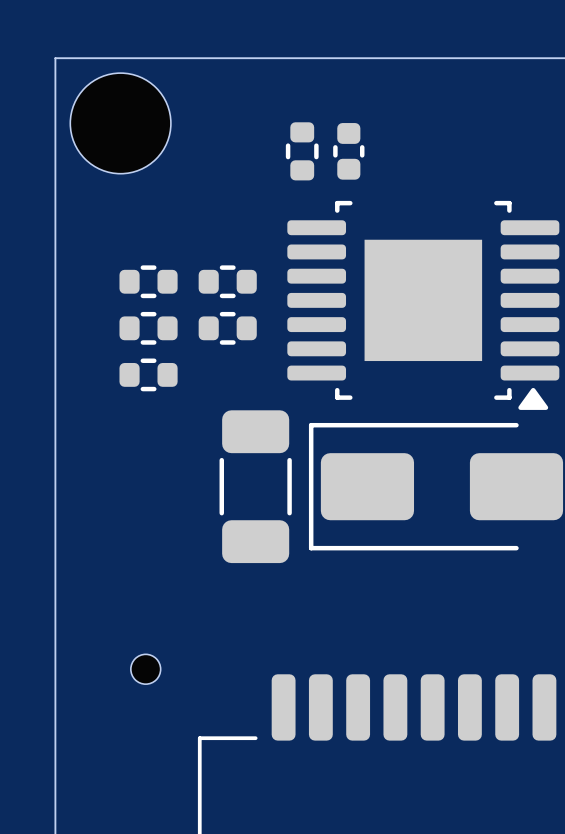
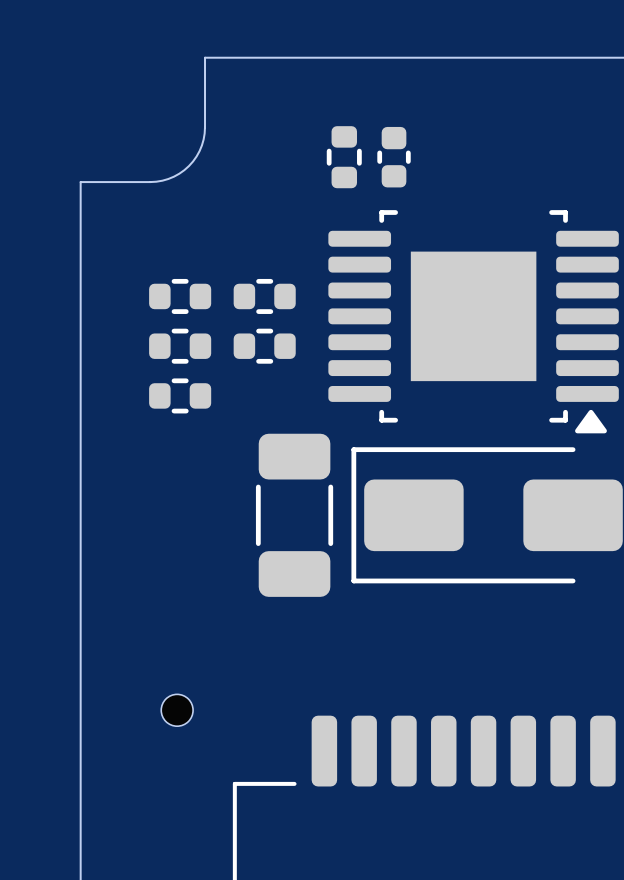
board edge: (171, 58) (55, 58) (55, 174) -> (205, 57) (204, 133) (199, 151) (188, 166) (174, 176) (156, 181) (80, 182)
part: (120, 123) -> none

